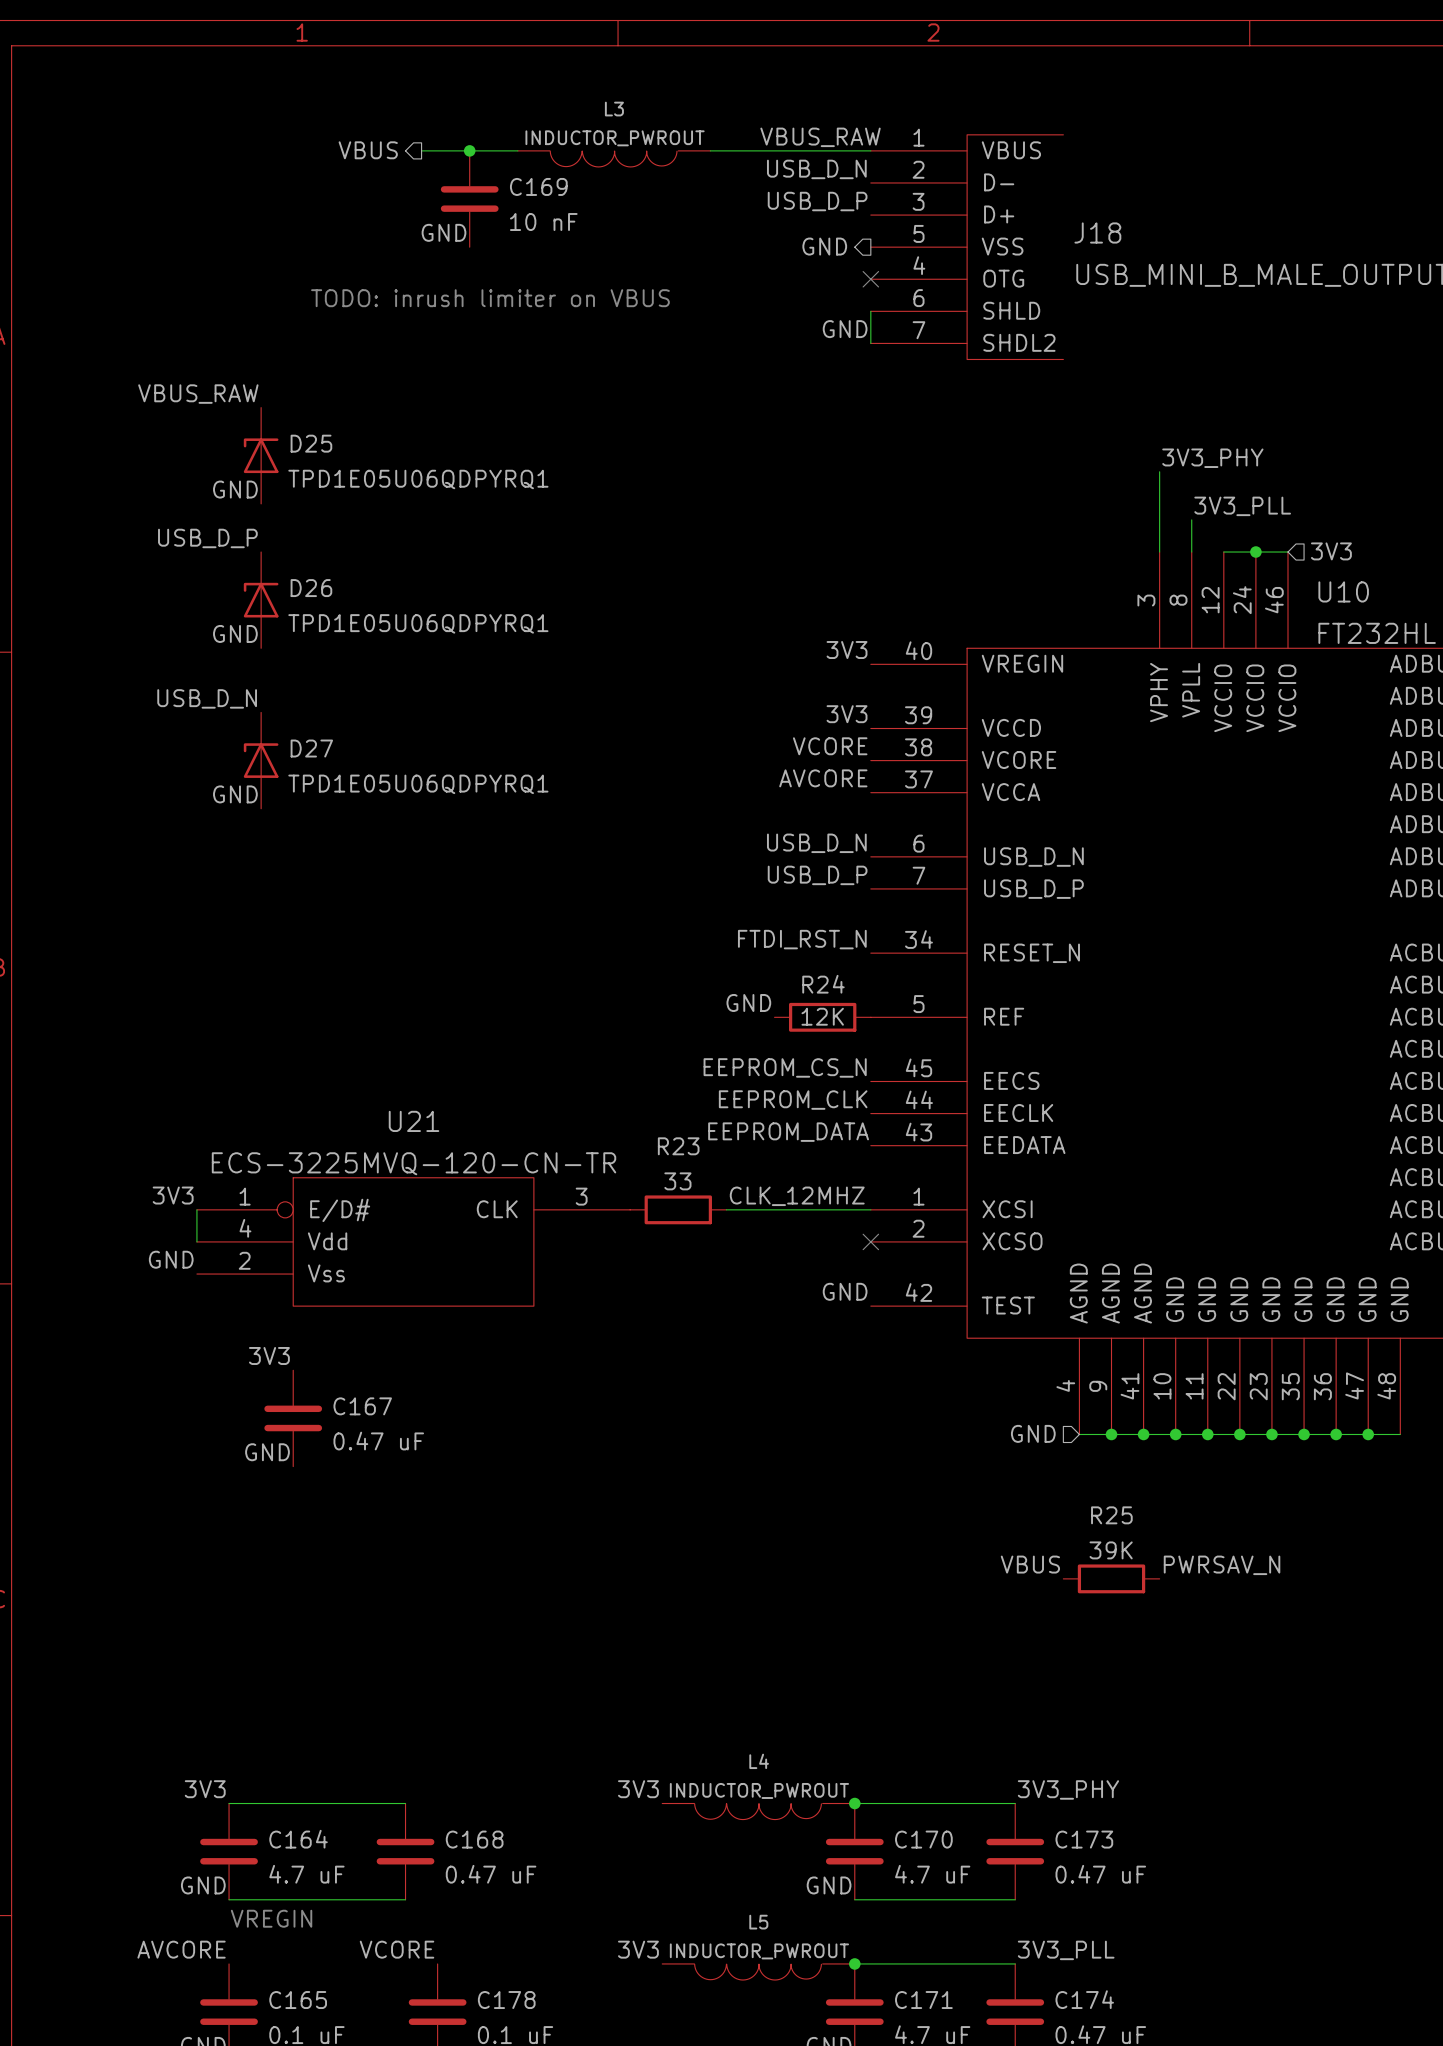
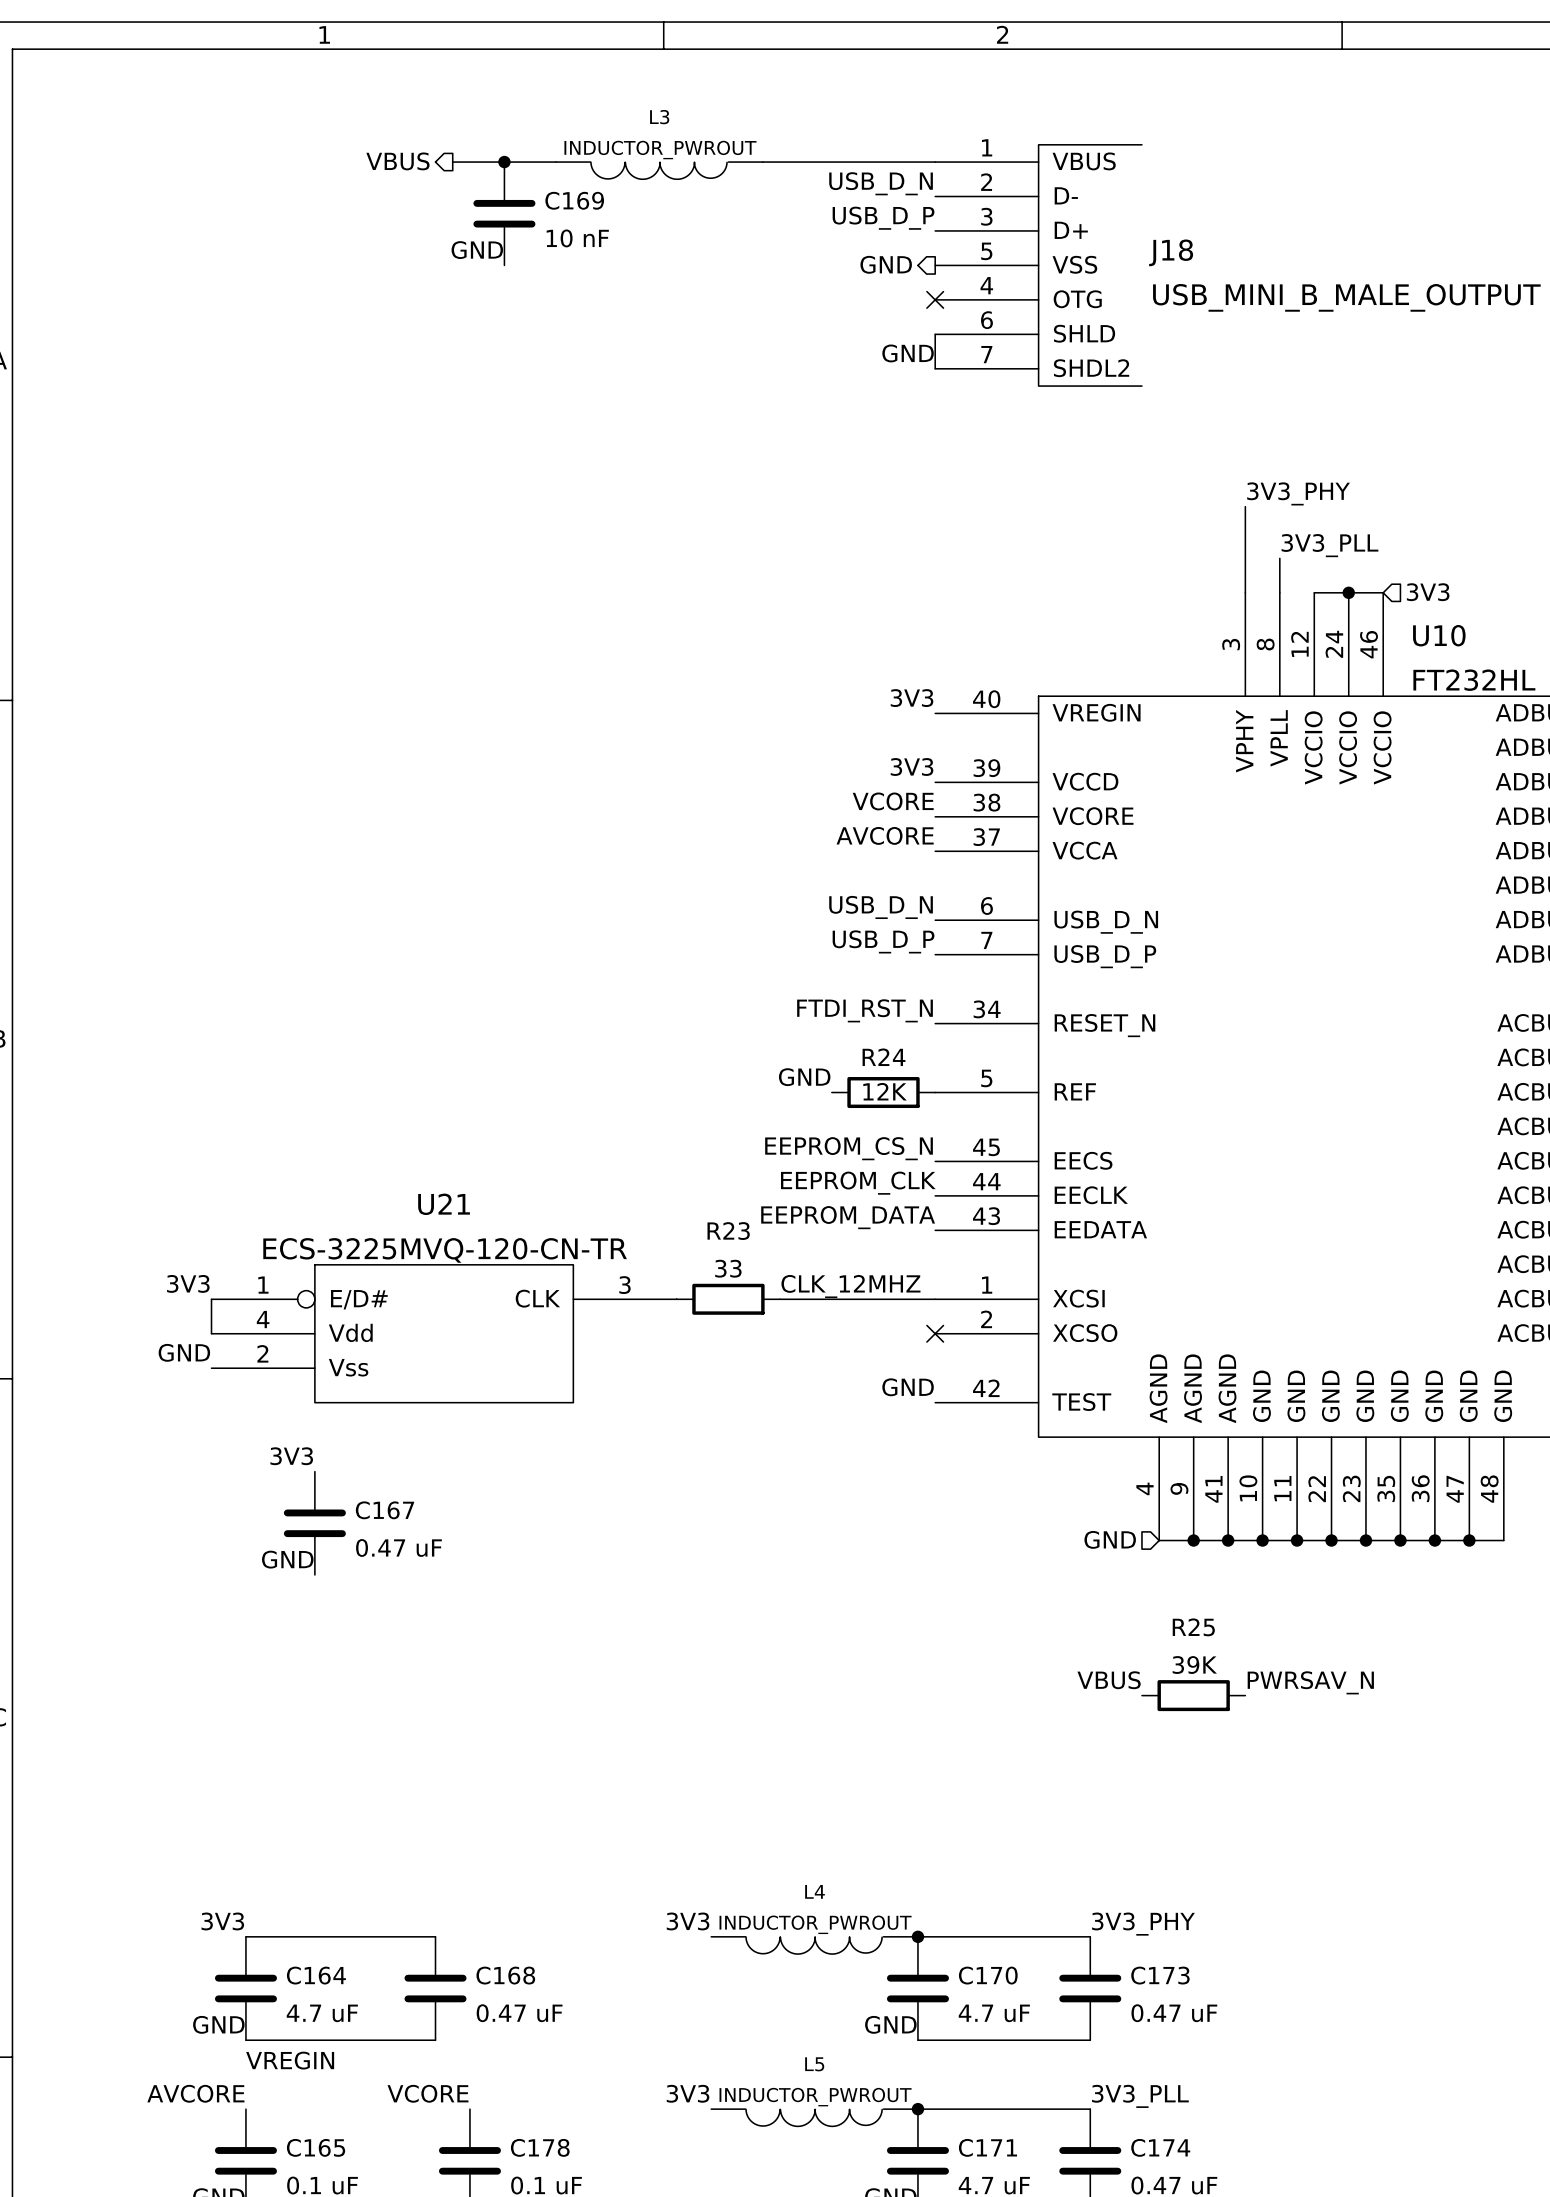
label: VBUS_RAW (820, 137) -> none
text: TODO: inrush limiter on VBUS (490, 298) -> none
label: VBUS_RAW (198, 394) -> none
D25: TPD1E05U06QDPYRQ1 (261, 455) -> none
label: GND (235, 489) -> none
label: USB_D_P (207, 538) -> none
D26: TPD1E05U06QDPYRQ1 (261, 600) -> none
label: GND (235, 633) -> none
label: USB_D_N (207, 698) -> none
D27: TPD1E05U06QDPYRQ1 (261, 760) -> none
label: GND (235, 794) -> none

